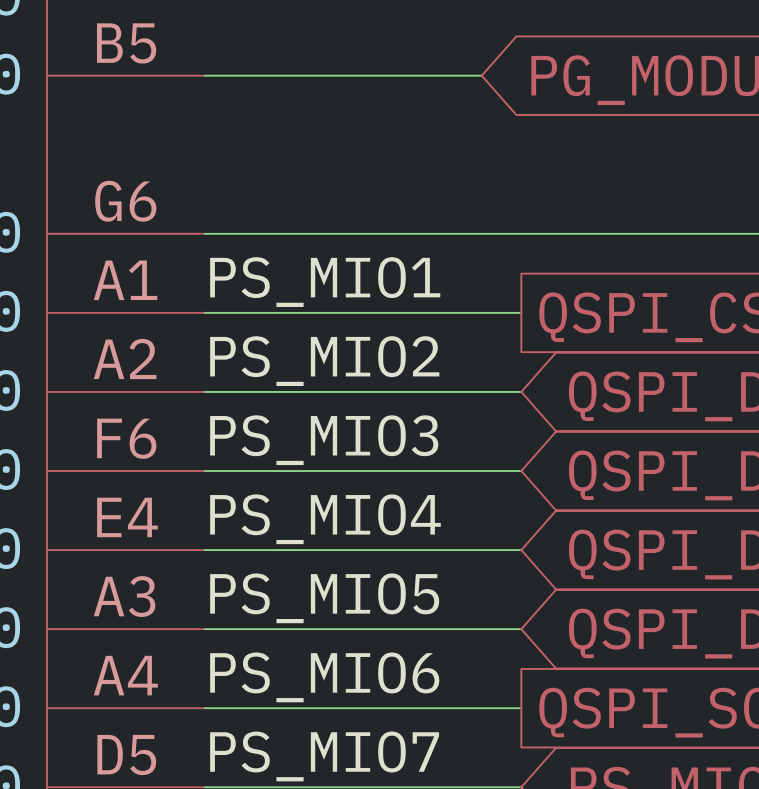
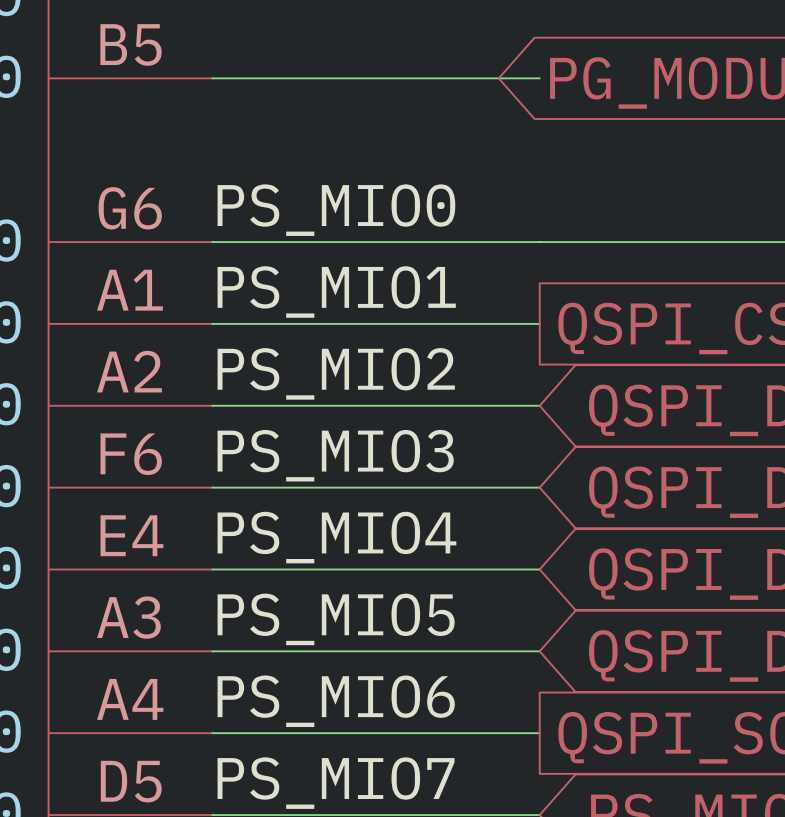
wire: none -> (498, 78) (539, 78)
label: none -> PS_MIO0 (336, 210)

